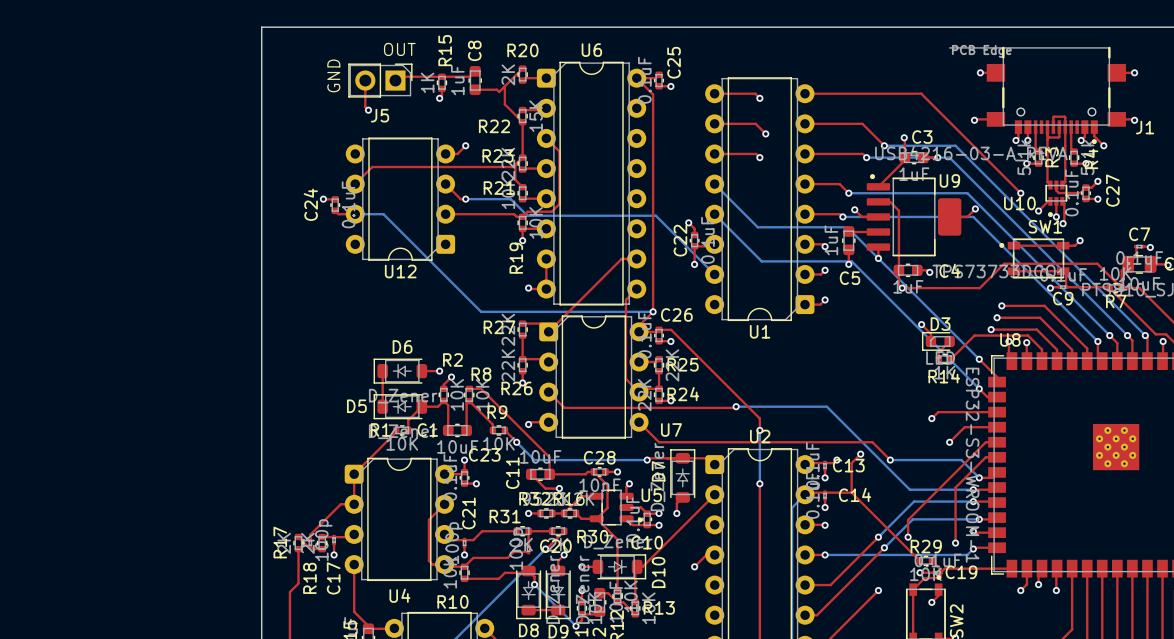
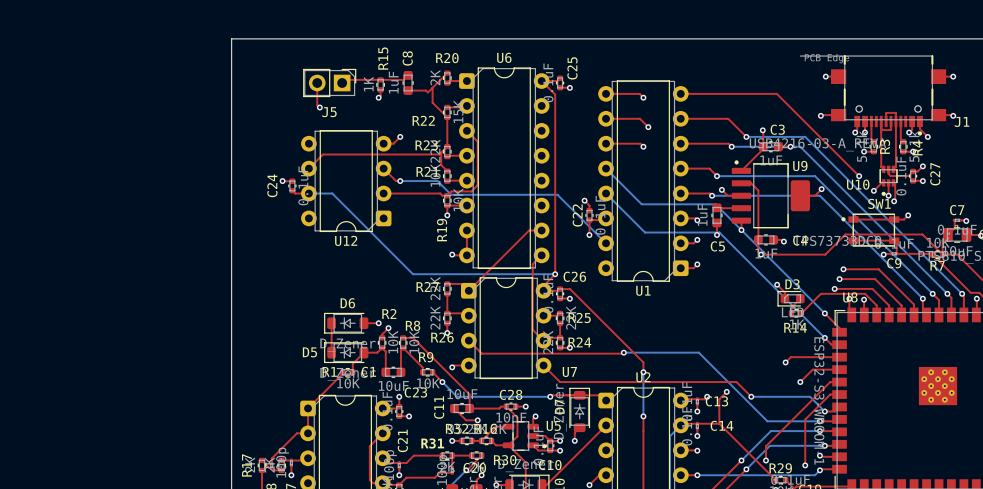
text: OUT (399, 49) -> none
text: GND (333, 75) -> none

